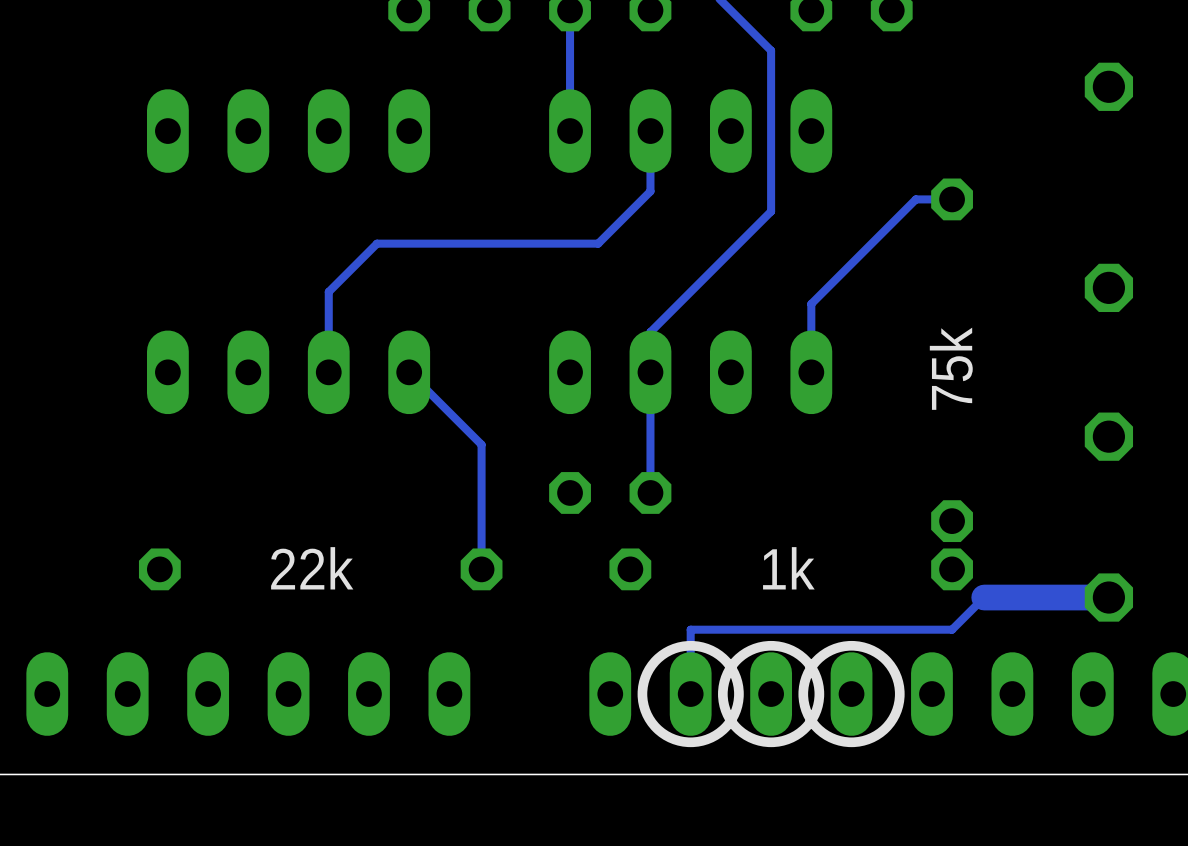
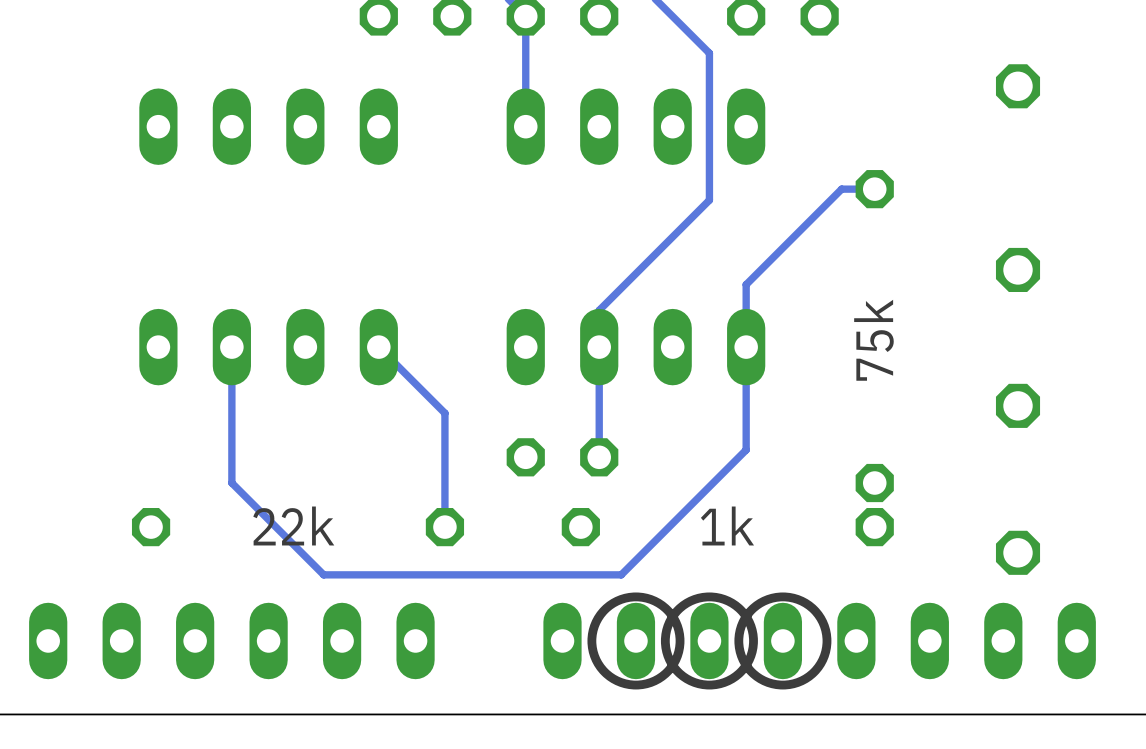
track: (650, 131) (650, 191) (598, 243) (377, 243) (328, 291) (328, 372) -> none
track: none -> (746, 347) (746, 449) (621, 574) (323, 574) (231, 483) (231, 347)
track: (1108, 597) (984, 597) (952, 629) (690, 629) (690, 694) -> none

